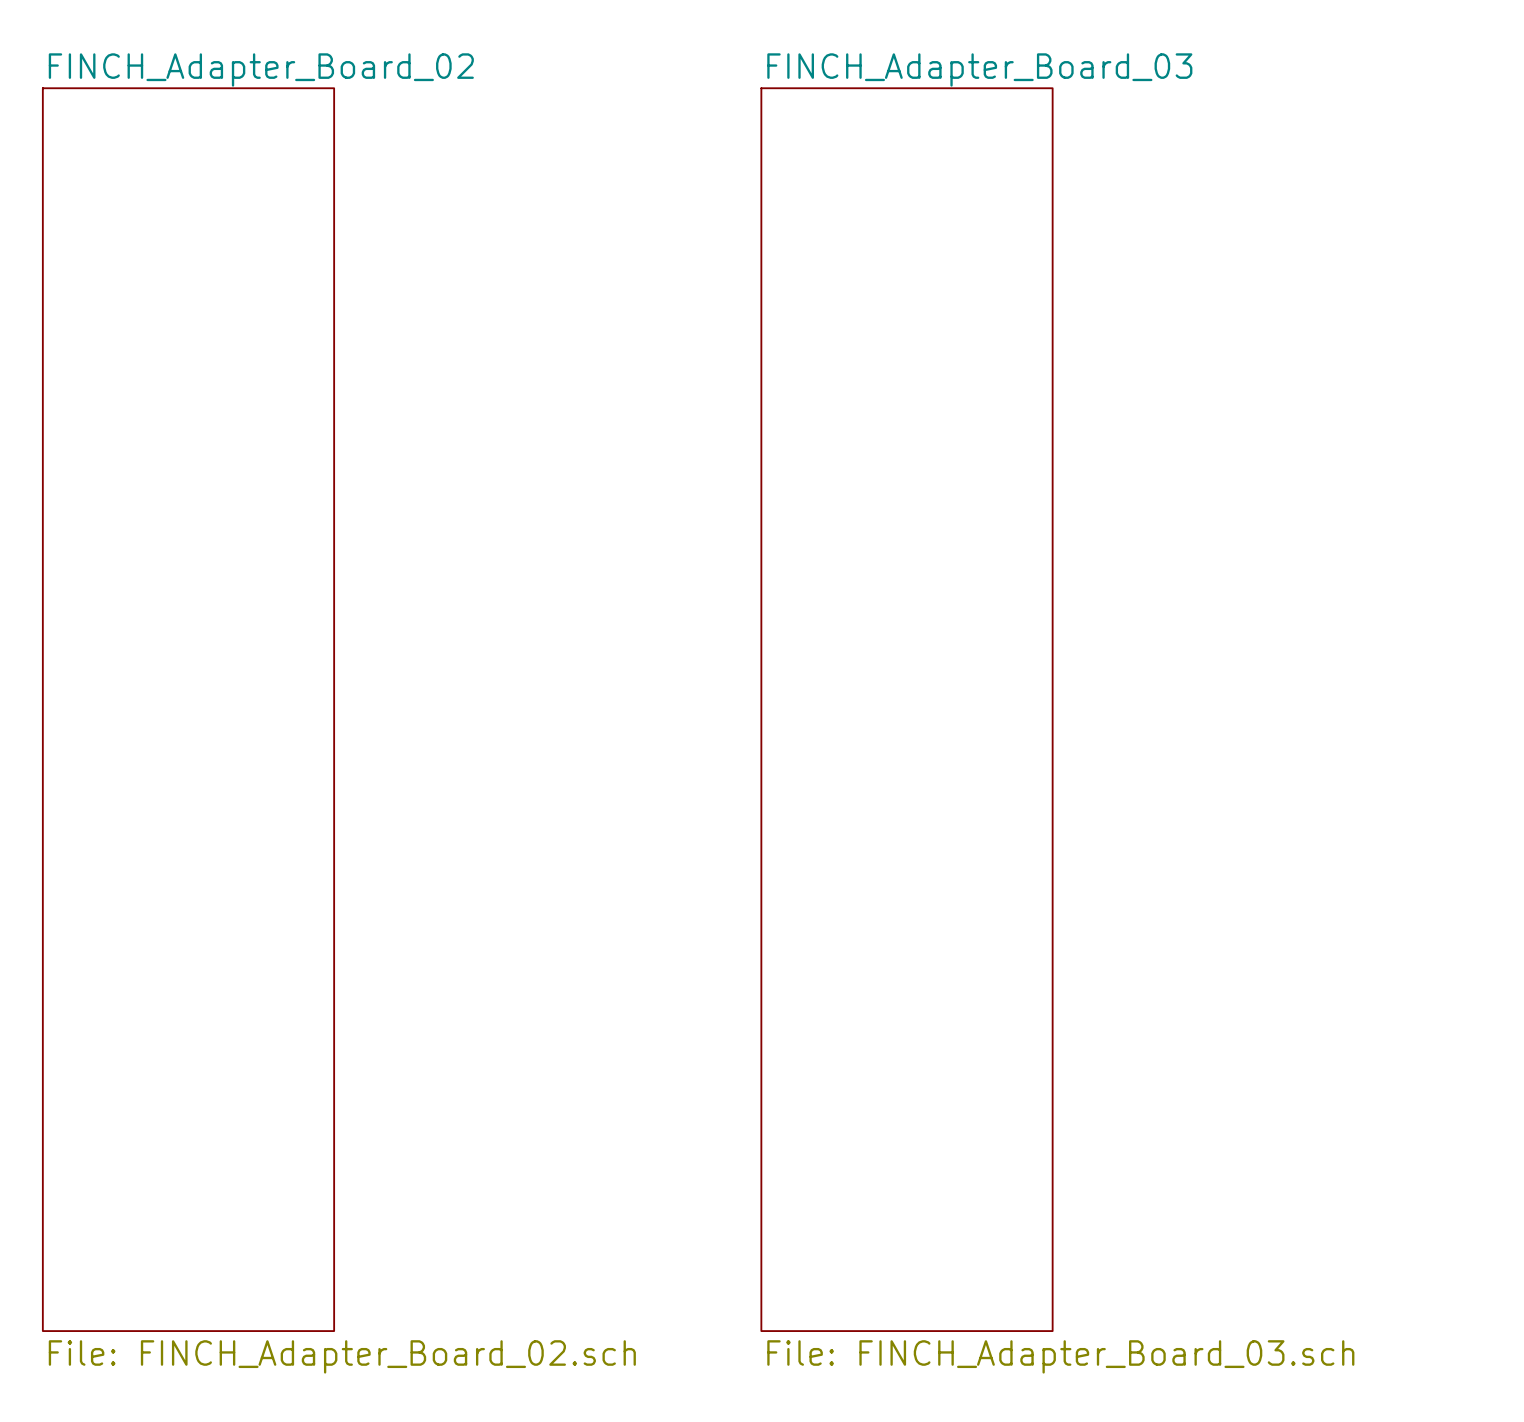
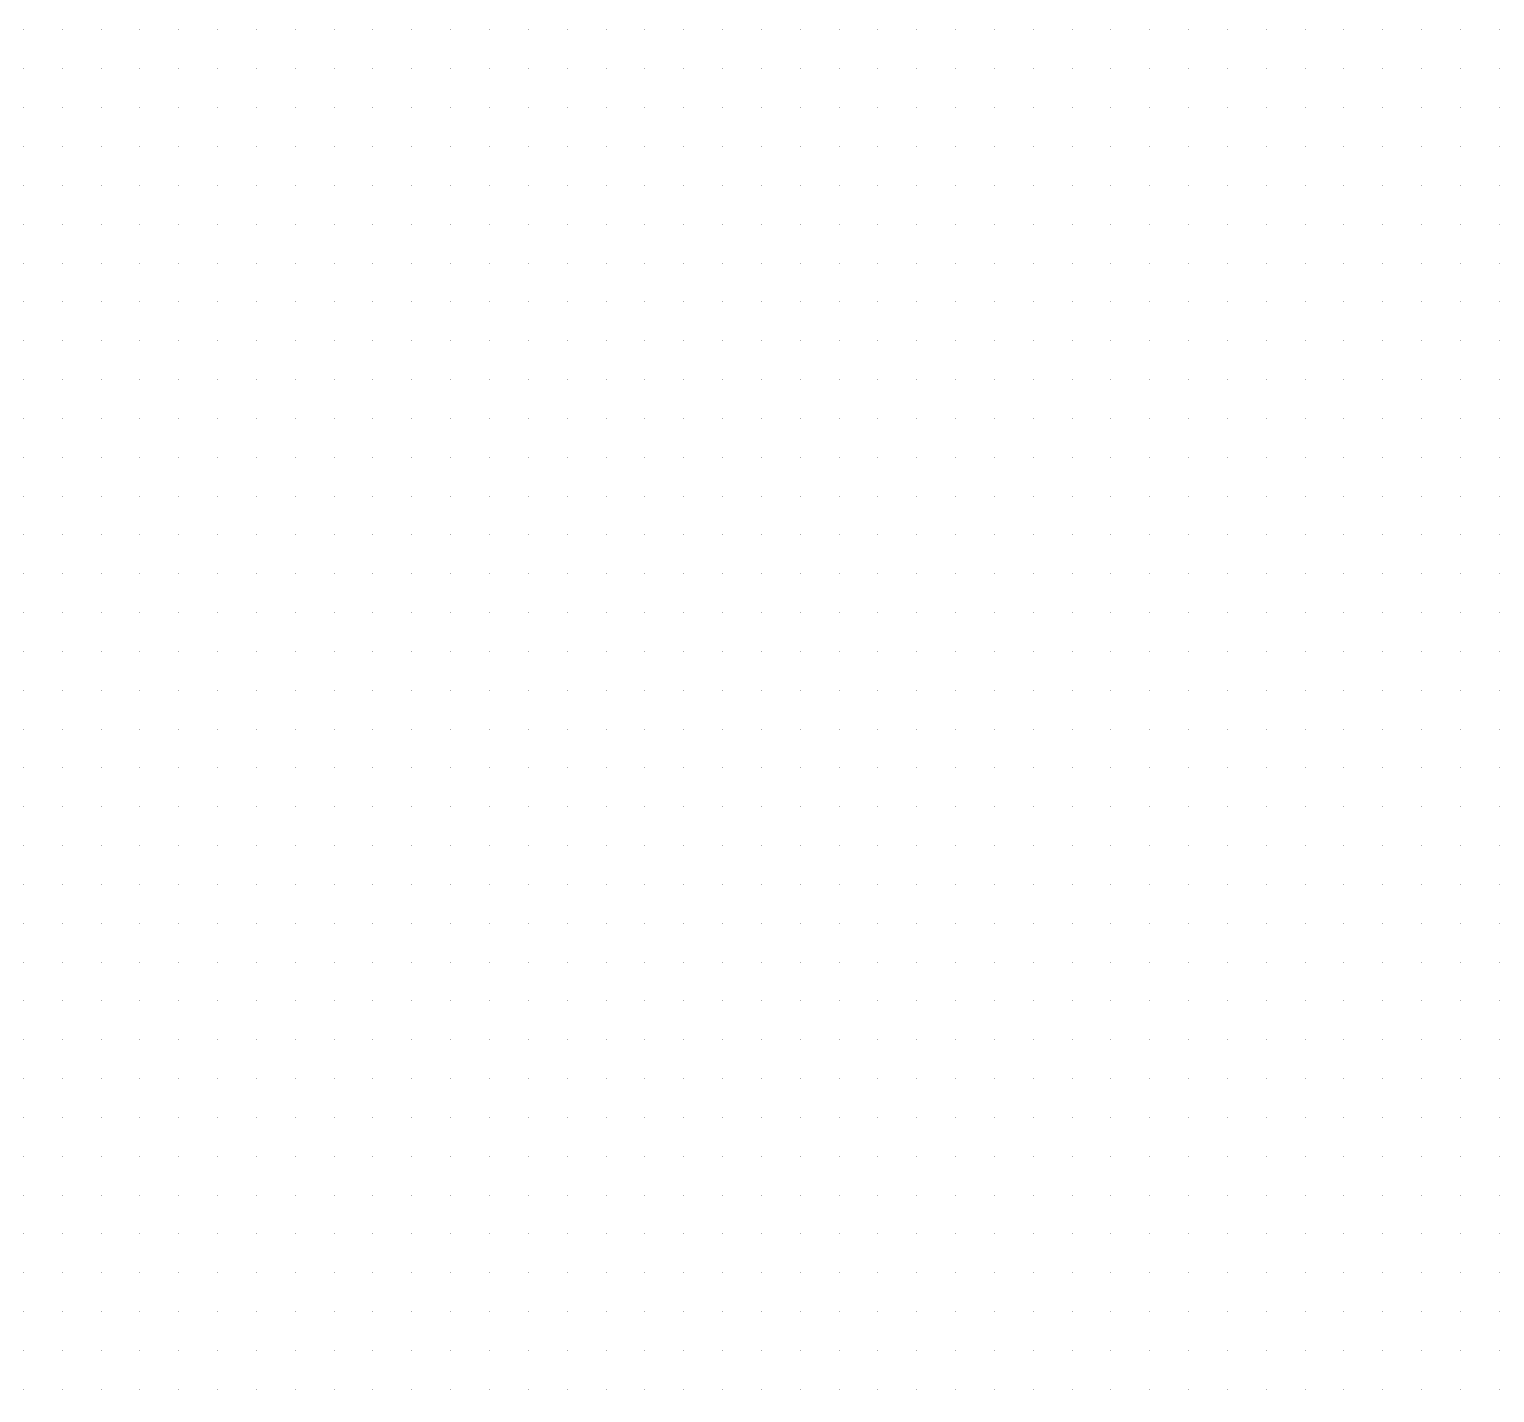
sheet FINCH_Adapter_Board_02: File: FINCH_Adapter_Board_02.sch (188, 709) -> none
sheet FINCH_Adapter_Board_03: File: FINCH_Adapter_Board_03.sch (907, 709) -> none

